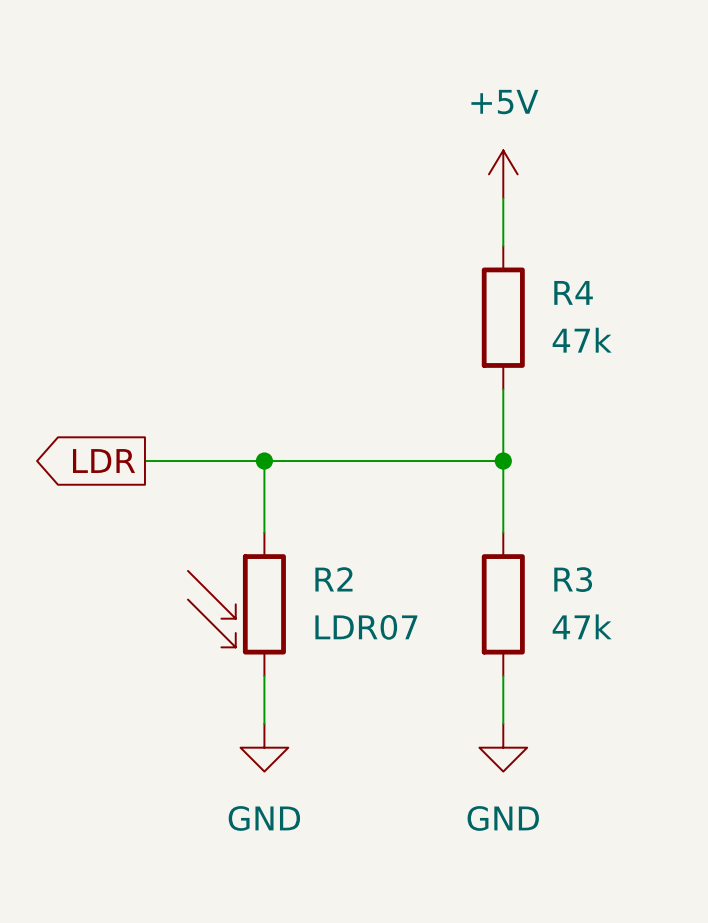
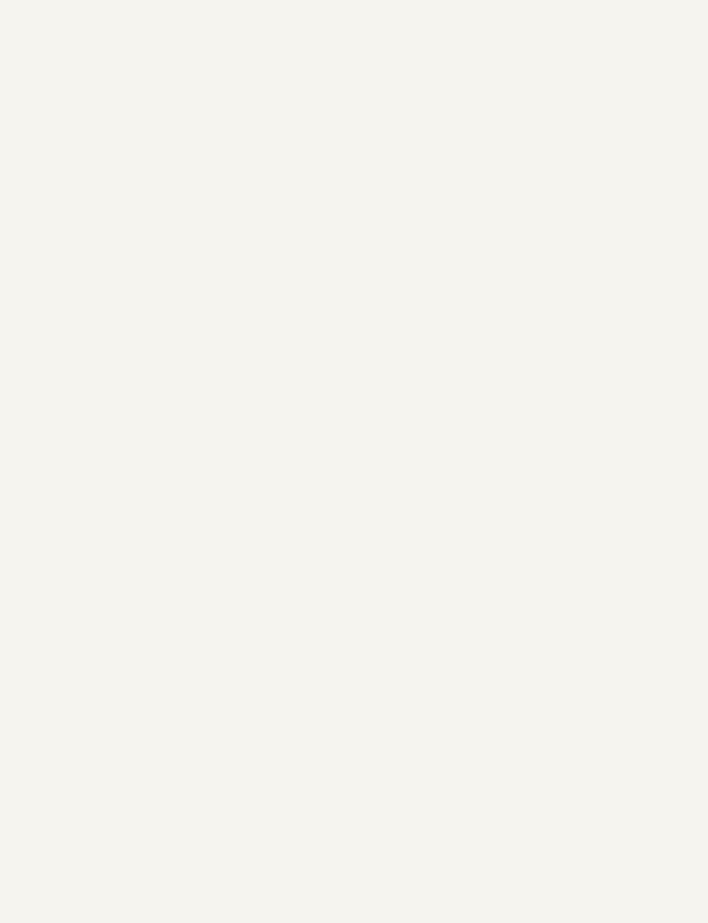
power symbol: +5V (503, 174) -> none
wire: (503, 198) (503, 246) -> none
R4: 47k (503, 317) -> none
wire: (503, 389) (503, 532) -> none
global label: LDR (104, 461) -> none
wire: (144, 461) (503, 461) -> none
wire: (264, 461) (264, 532) -> none
junction: (264, 461) -> none
junction: (503, 461) -> none
R2: LDR07 (236, 604) -> none
R3: 47k (503, 604) -> none
wire: (264, 676) (264, 723) -> none
wire: (503, 676) (503, 723) -> none
power symbol: GND (264, 747) -> none
power symbol: GND (503, 747) -> none

